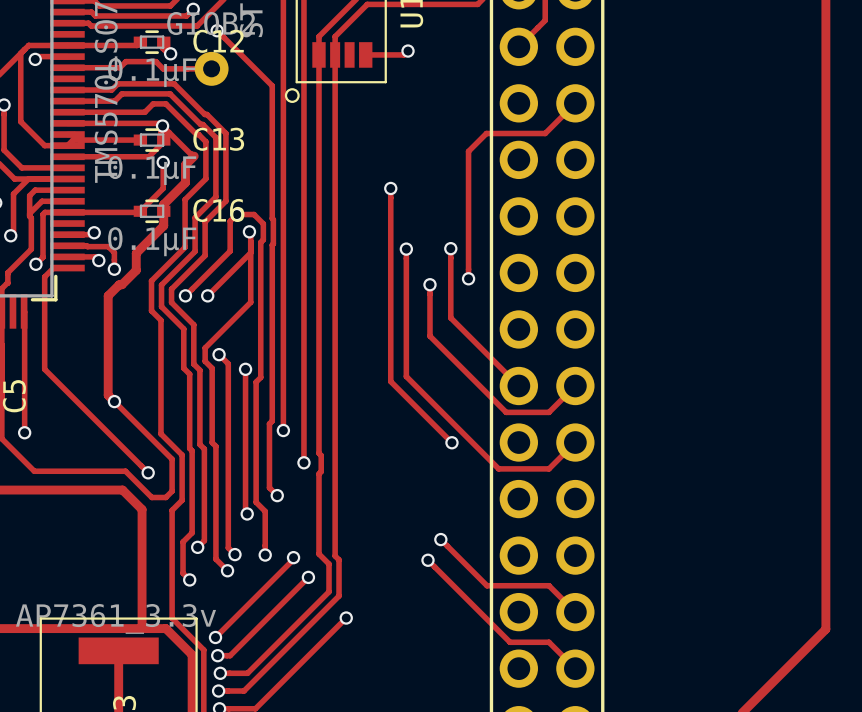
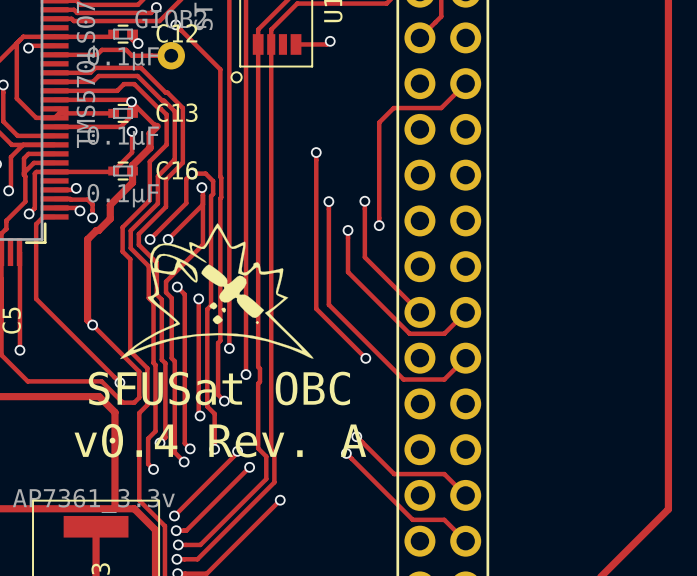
drawing: none -> [120, 223, 314, 360]
text: none -> SFUSat OBC (219, 388)
text: none -> v0.4 Rev. A (220, 440)

